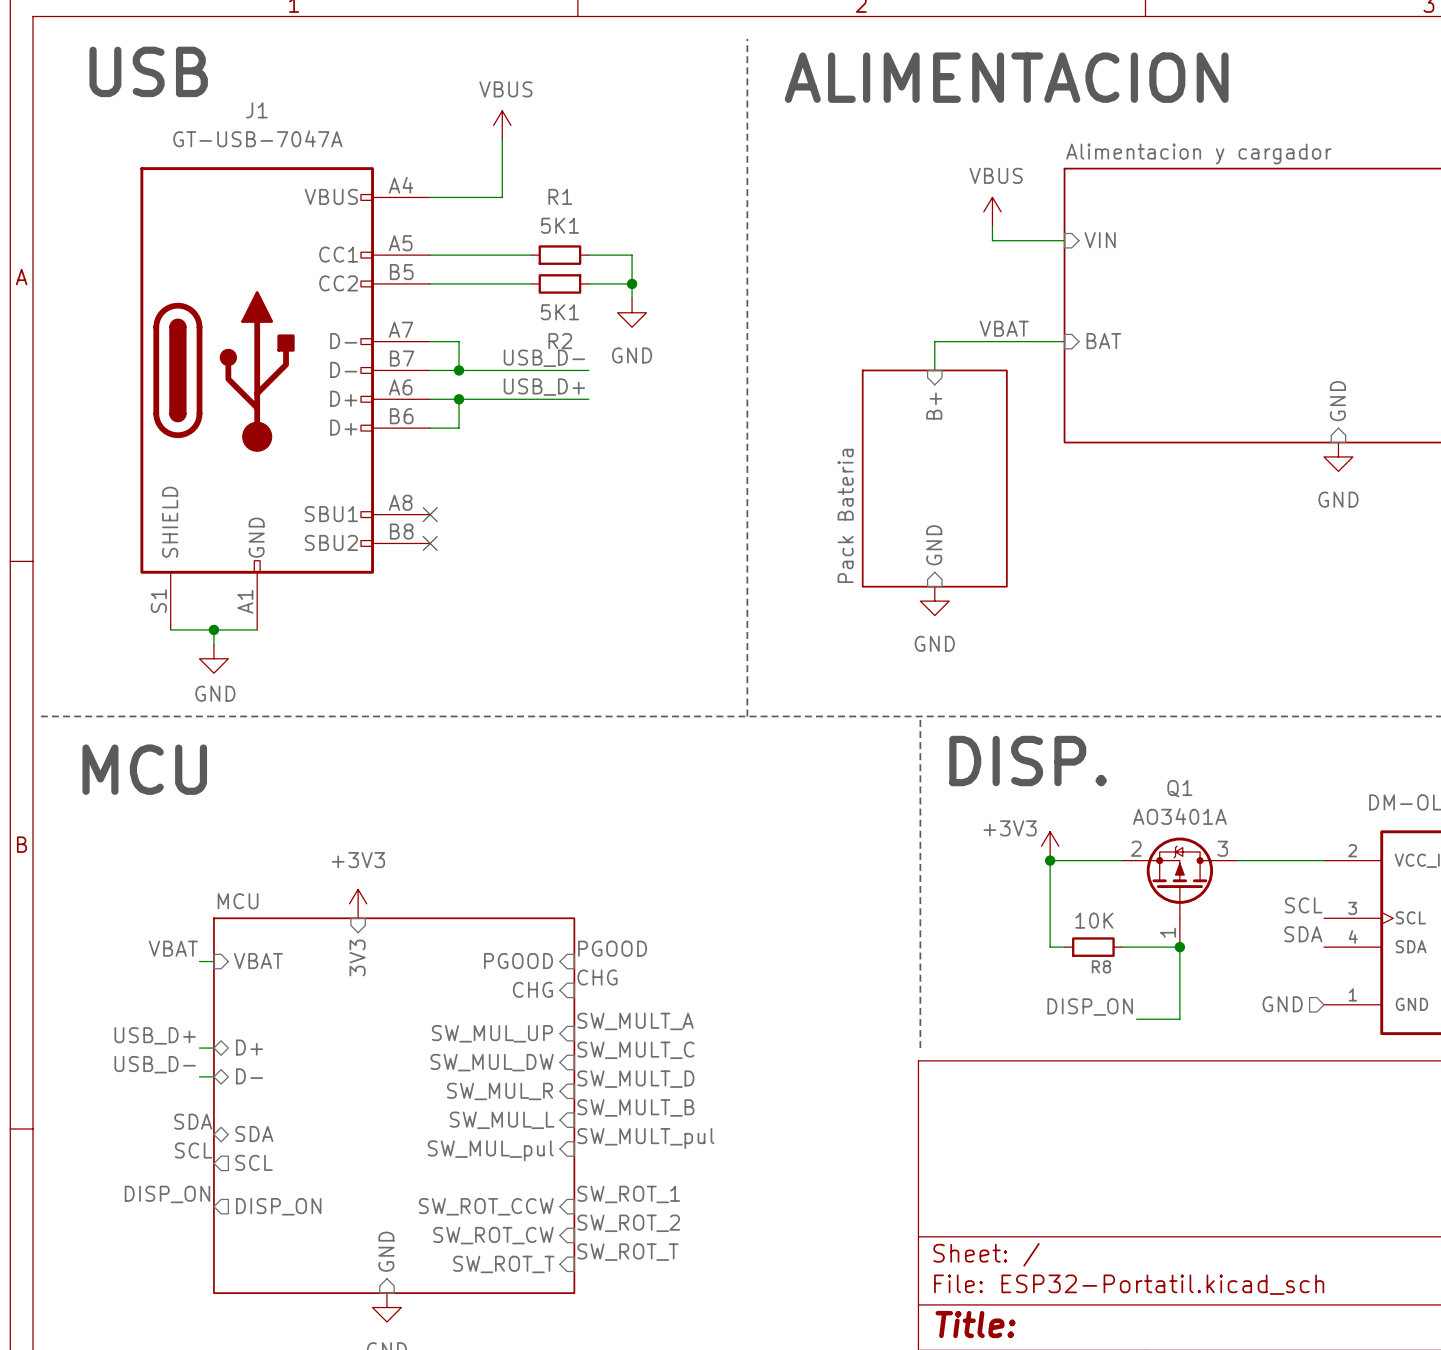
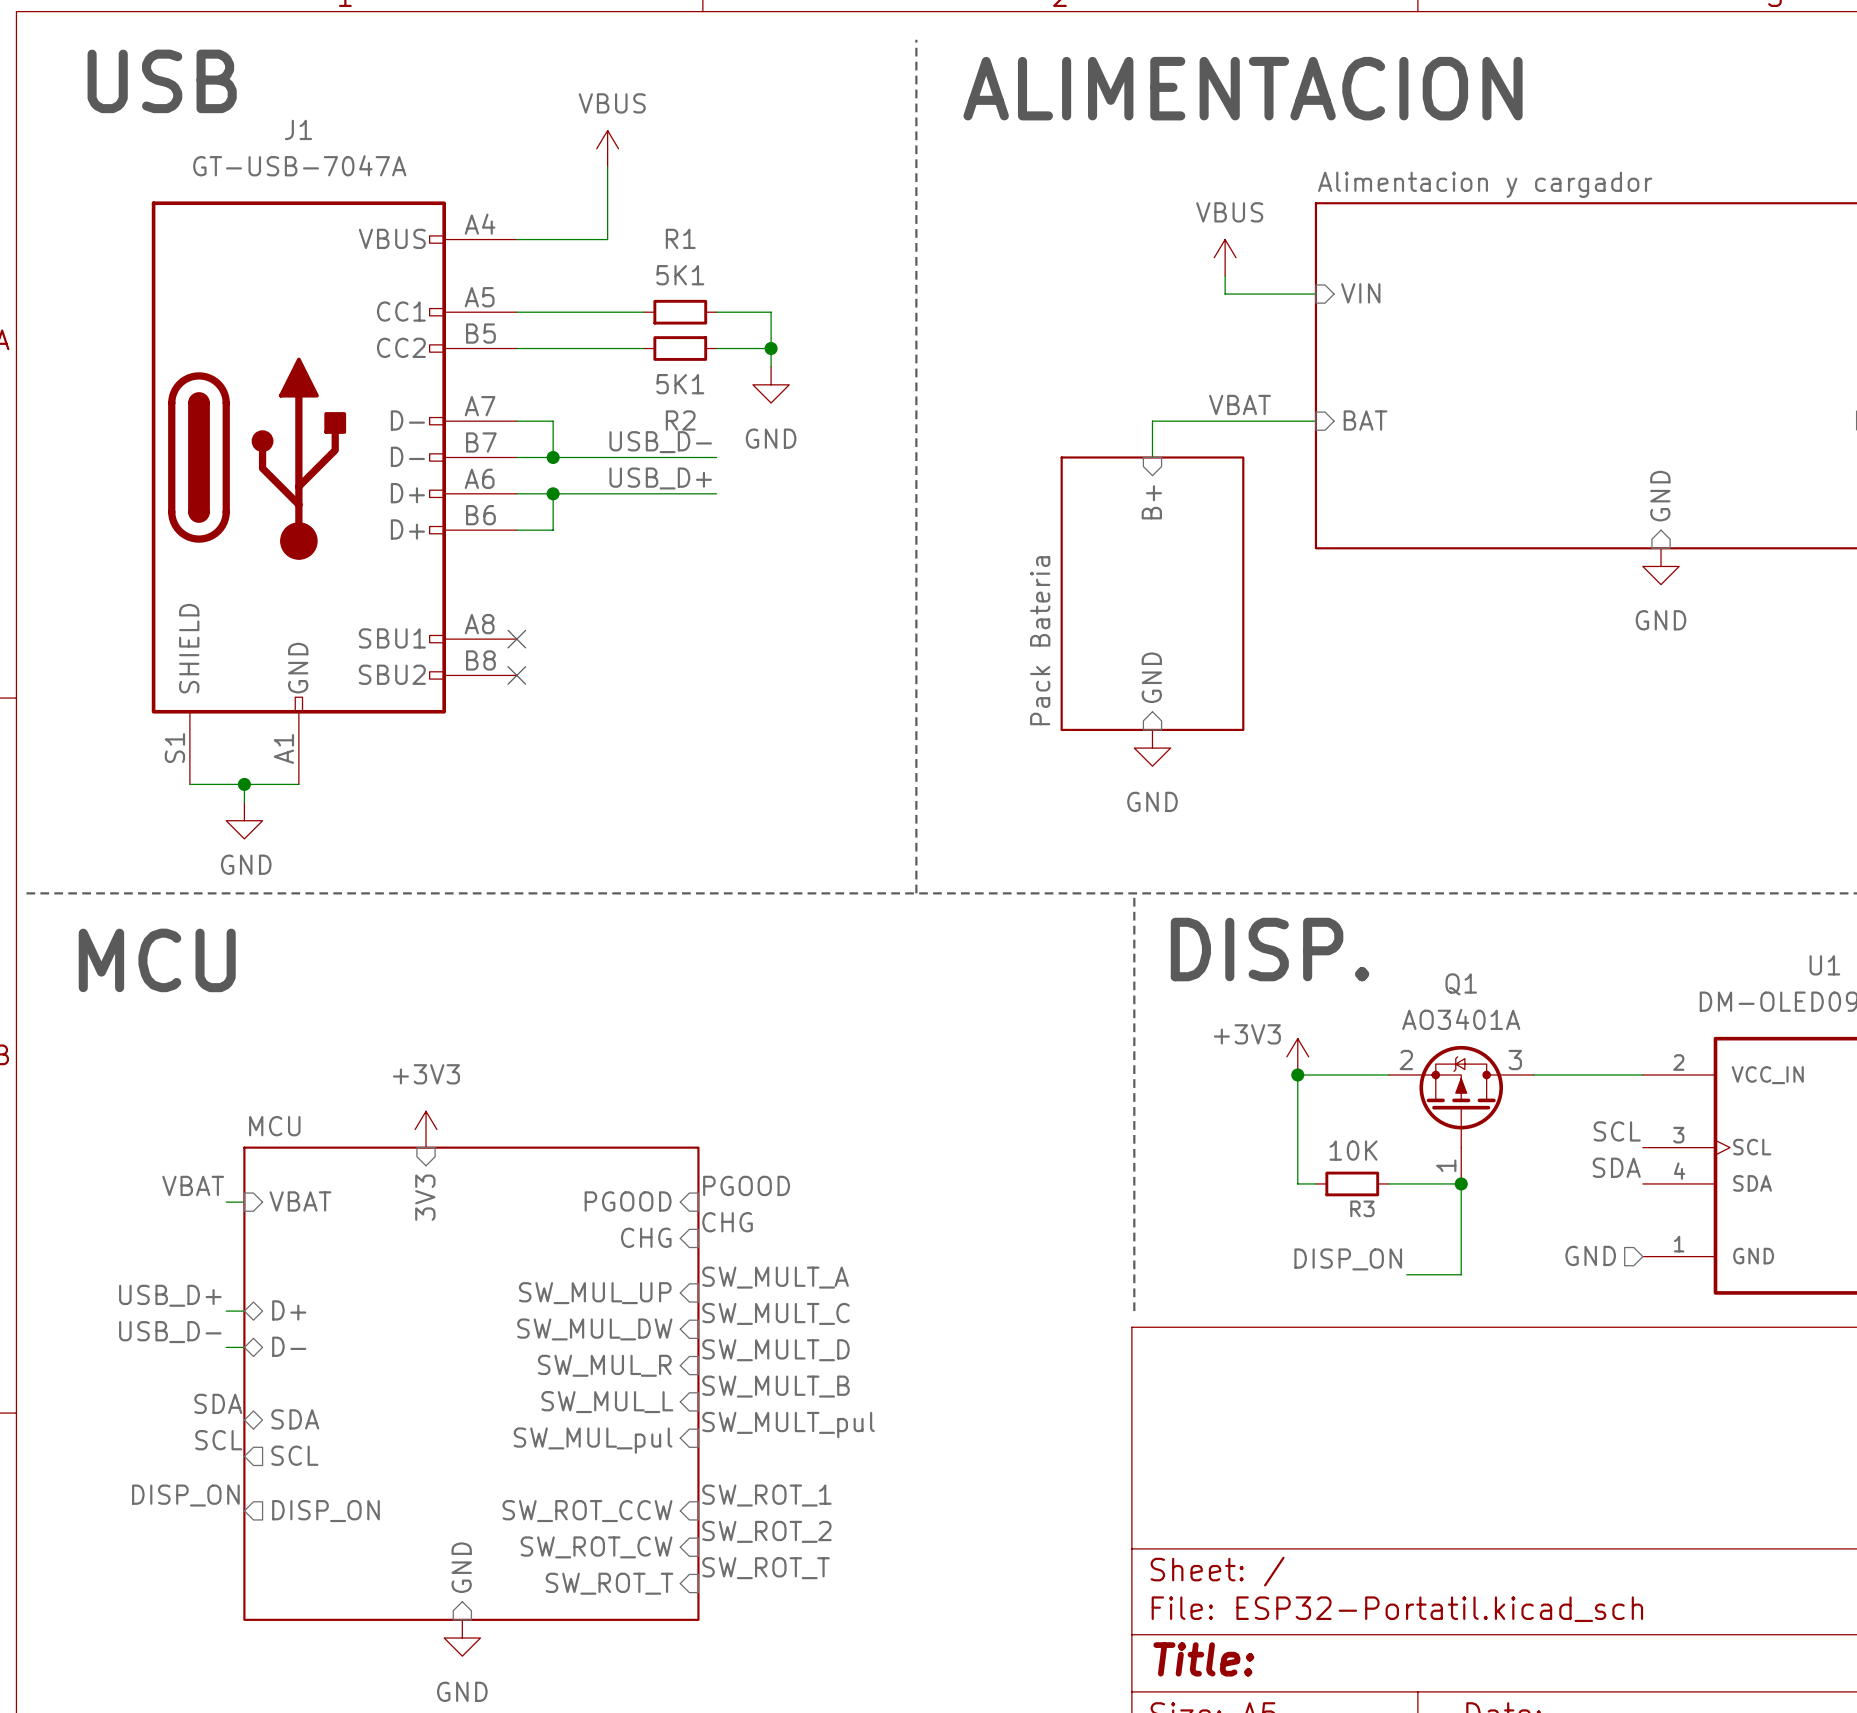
R8 name: R8 (1101, 966) -> R3 (1362, 1208)

